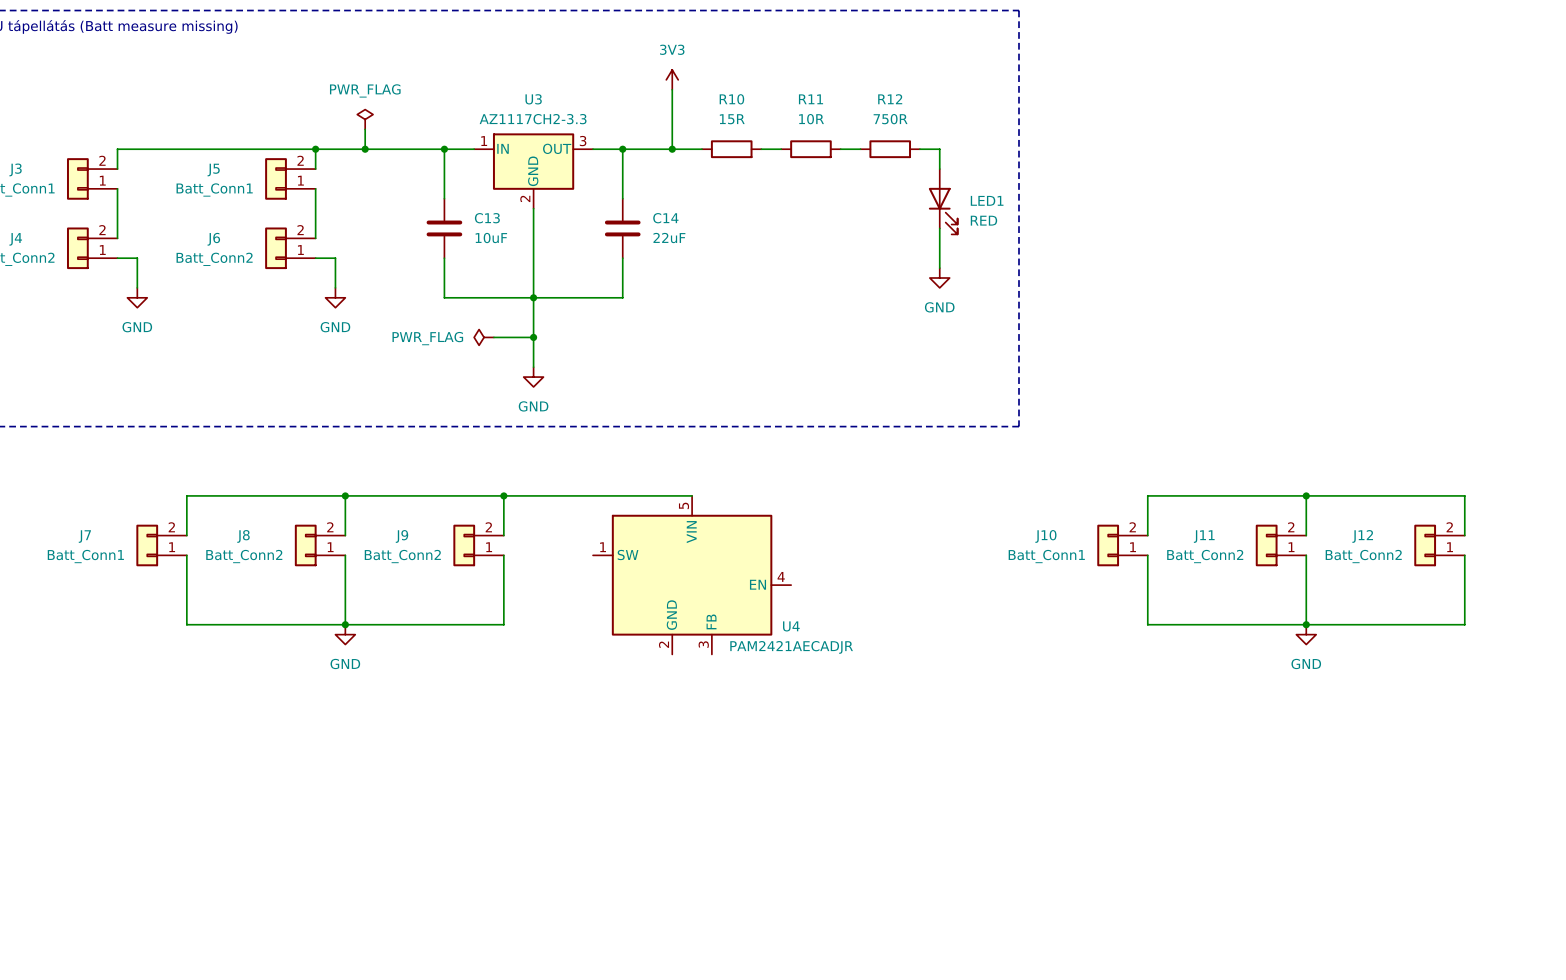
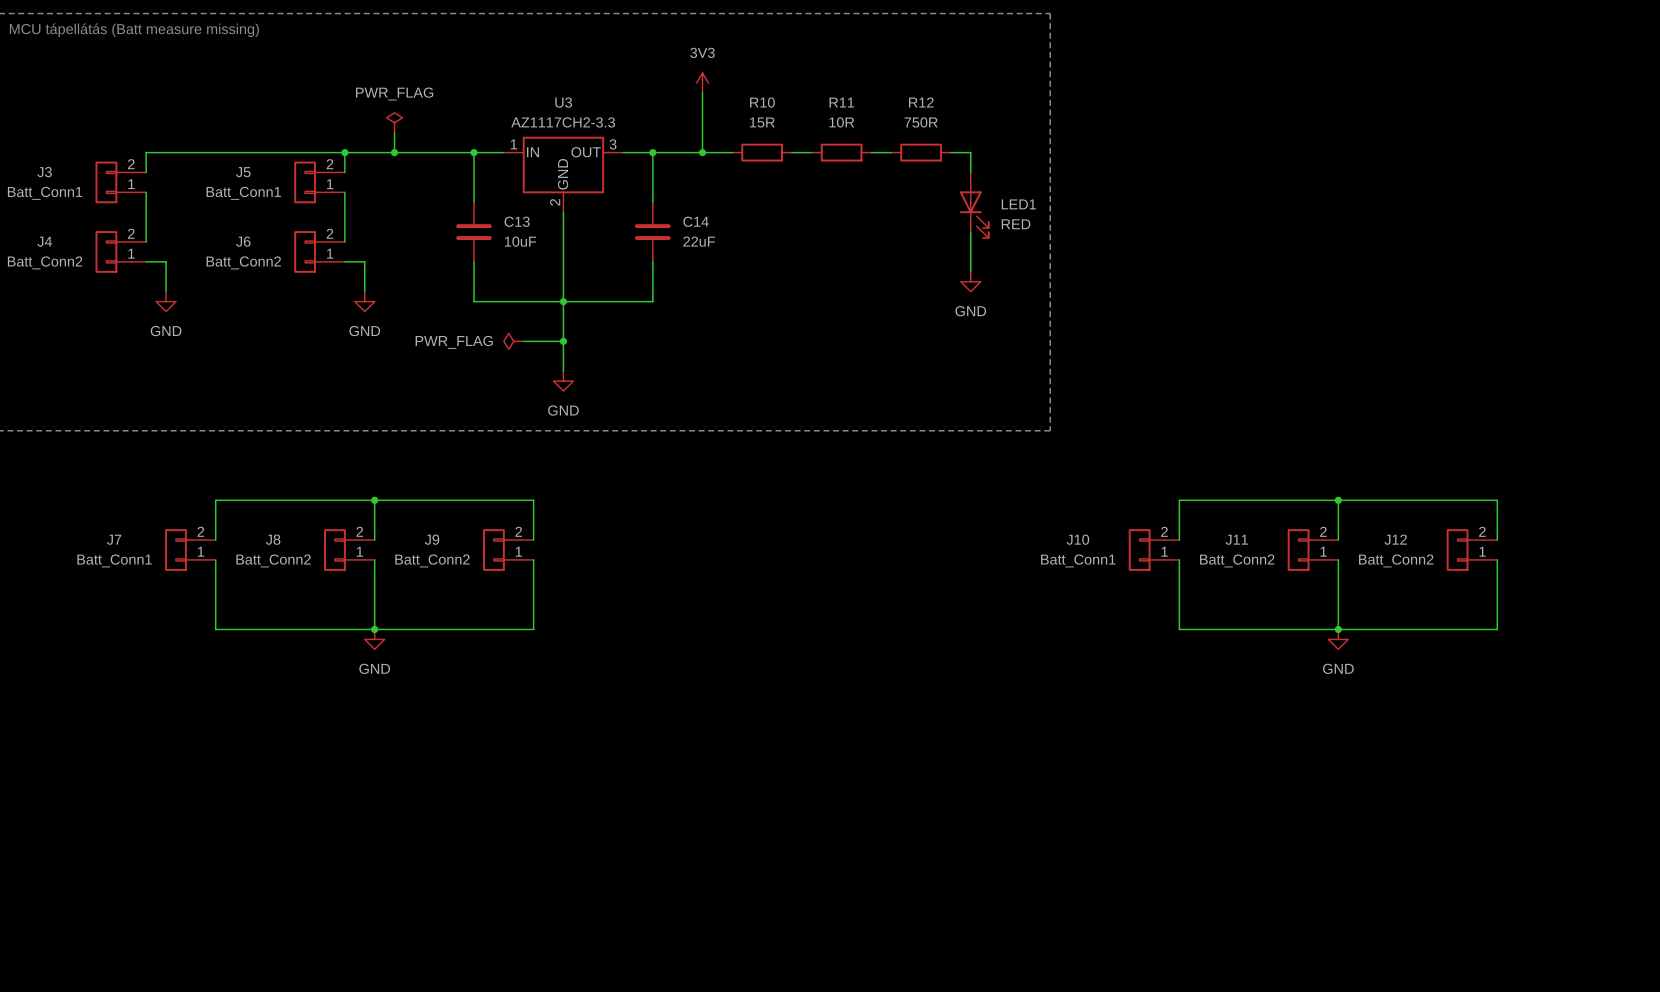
wire: (503, 495) (692, 495) -> none
junction: (503, 495) -> none
U4: PAM2421AECADJR (692, 575) -> none

